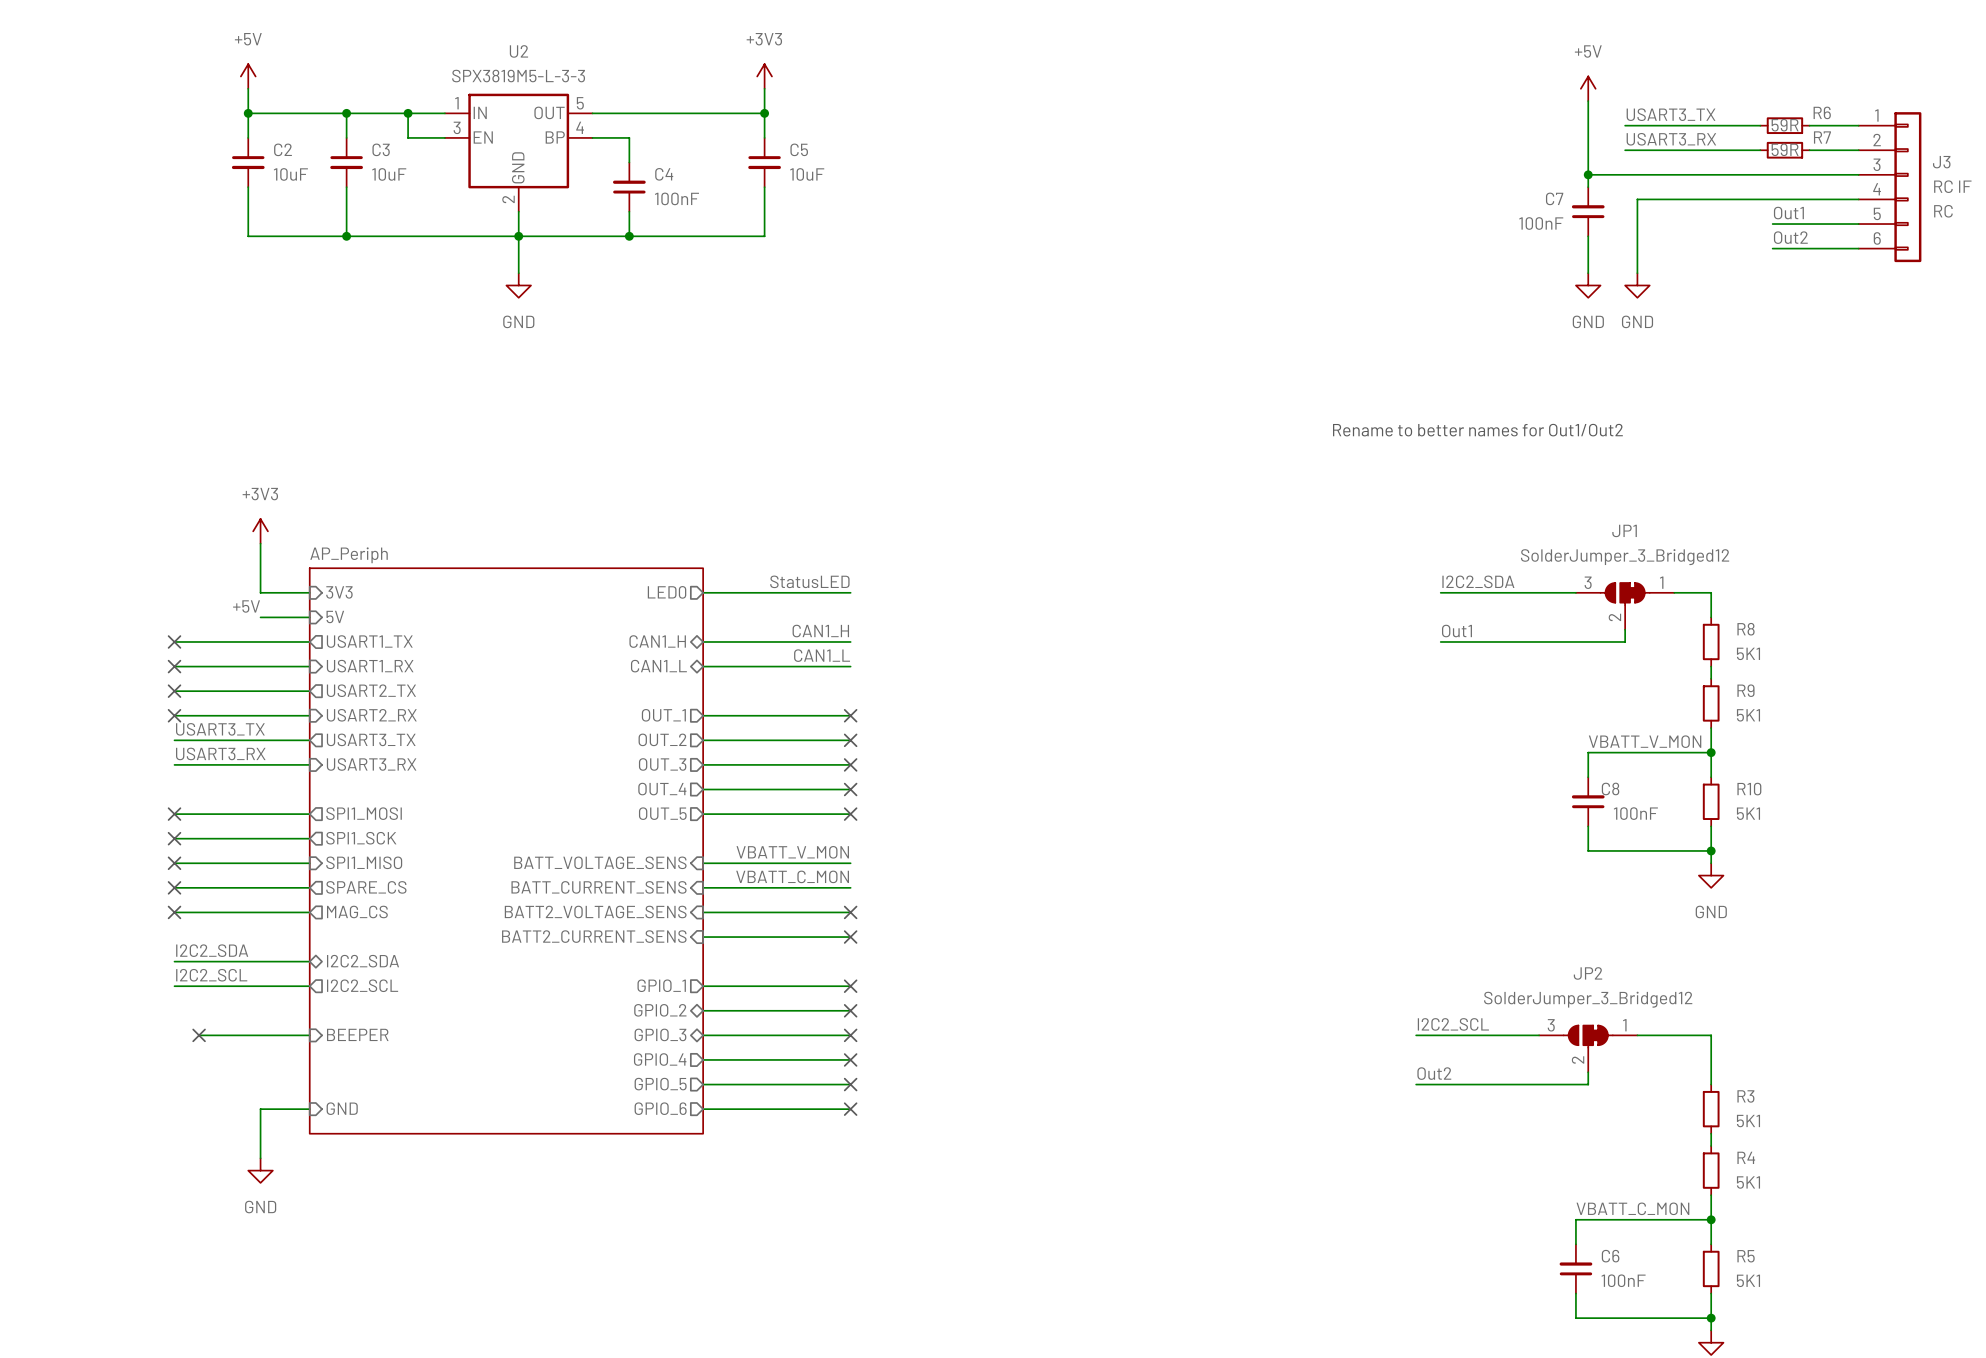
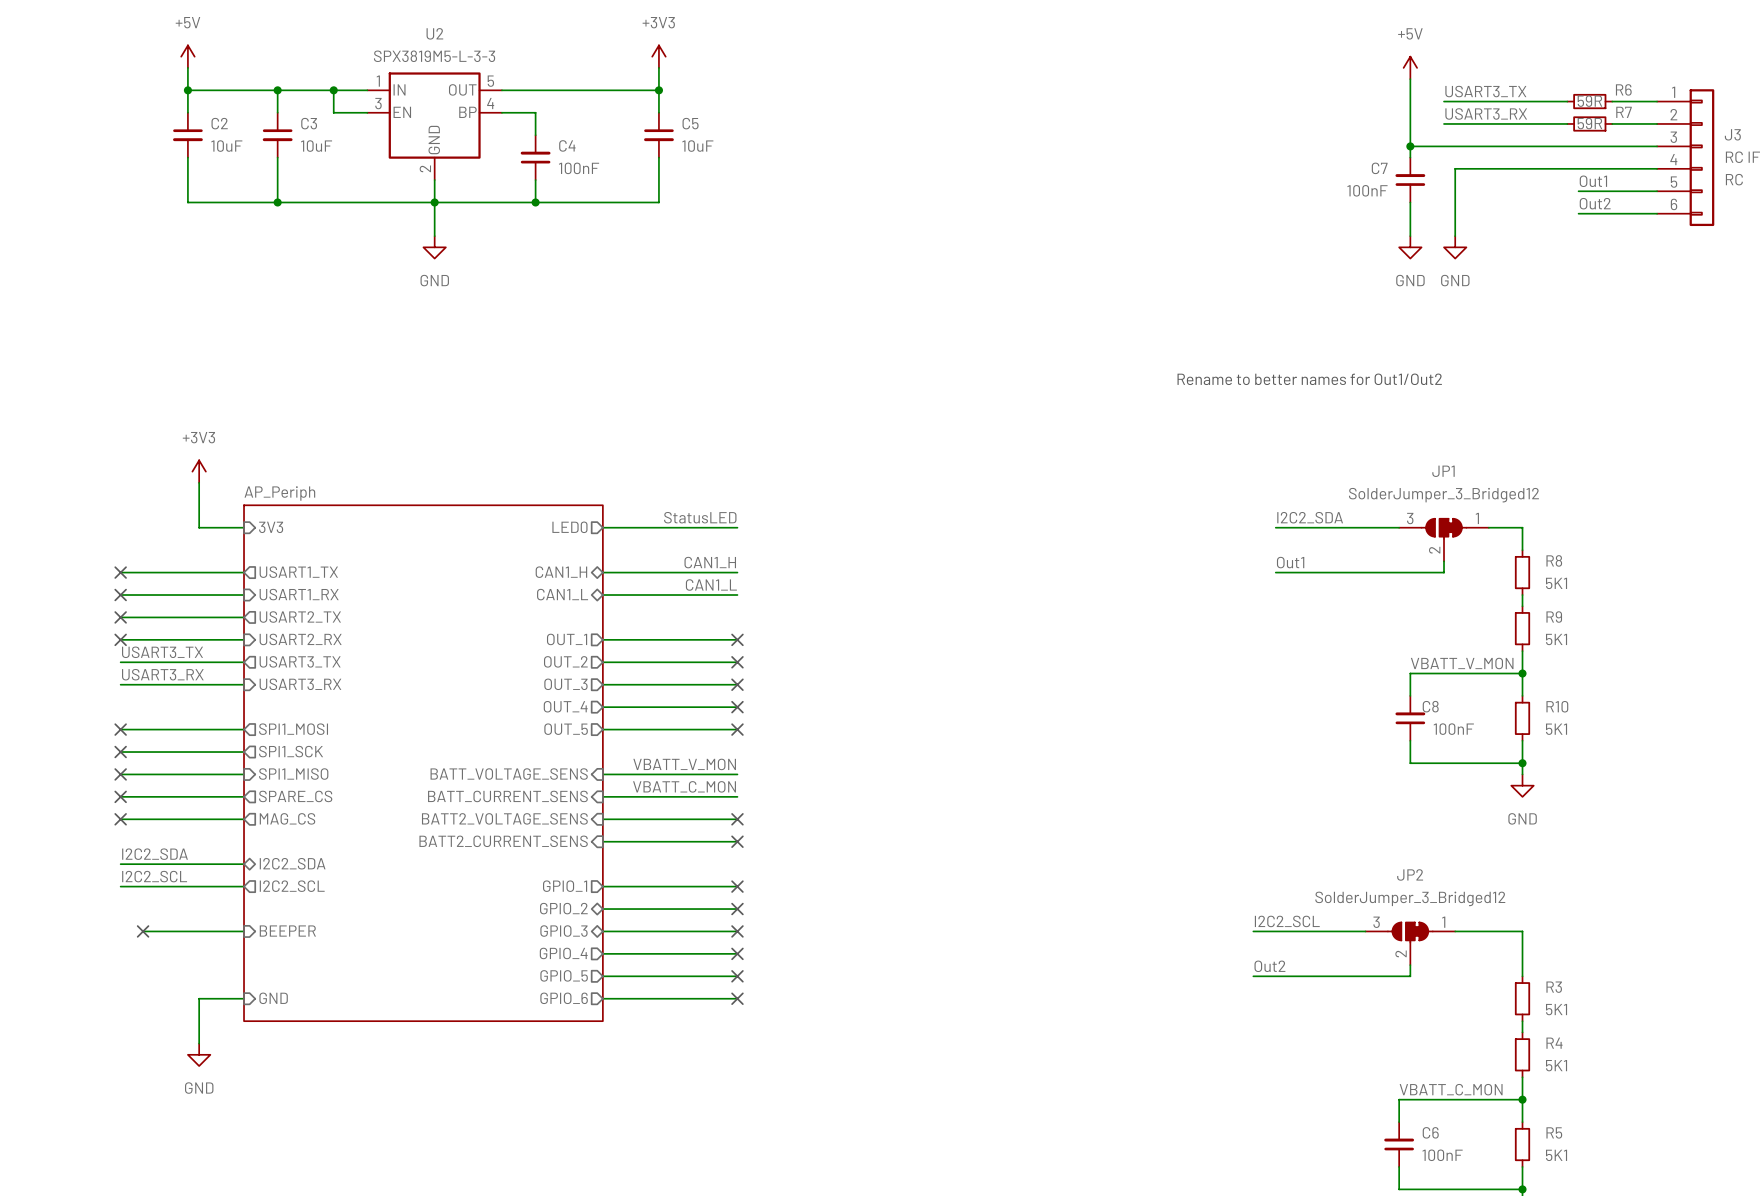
label: +5V (246, 606) -> none
wire: (260, 617) (309, 617) -> none
sheet pin: 5V (335, 617) -> none

